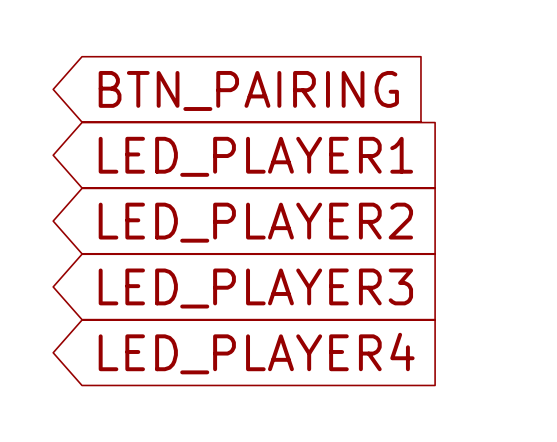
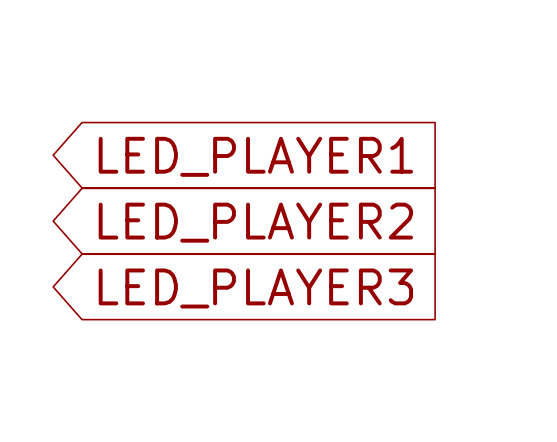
global label: BTN_PAIRING (248, 90) -> none
global label: LED_PLAYER4 (256, 353) -> none

